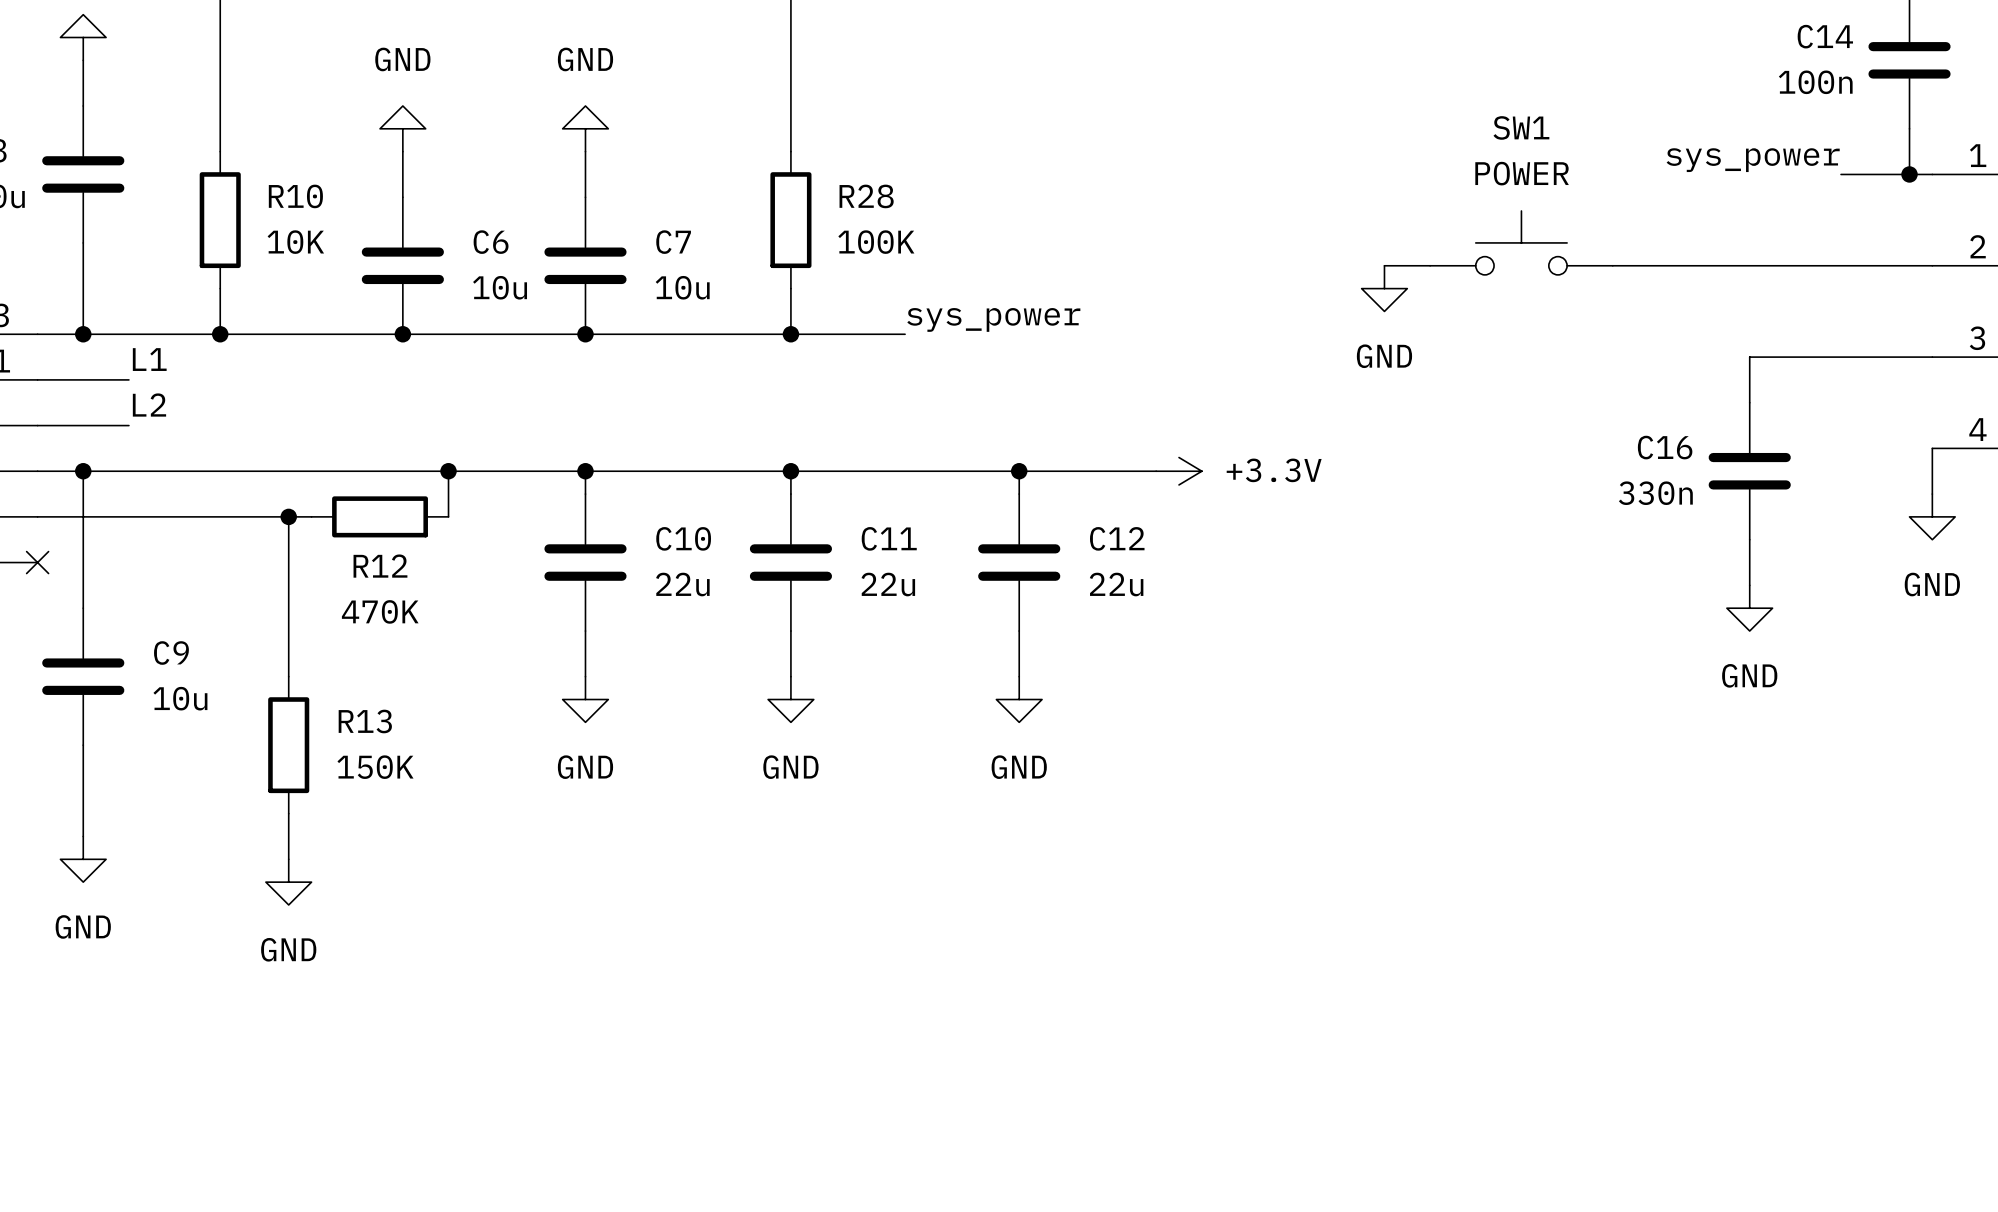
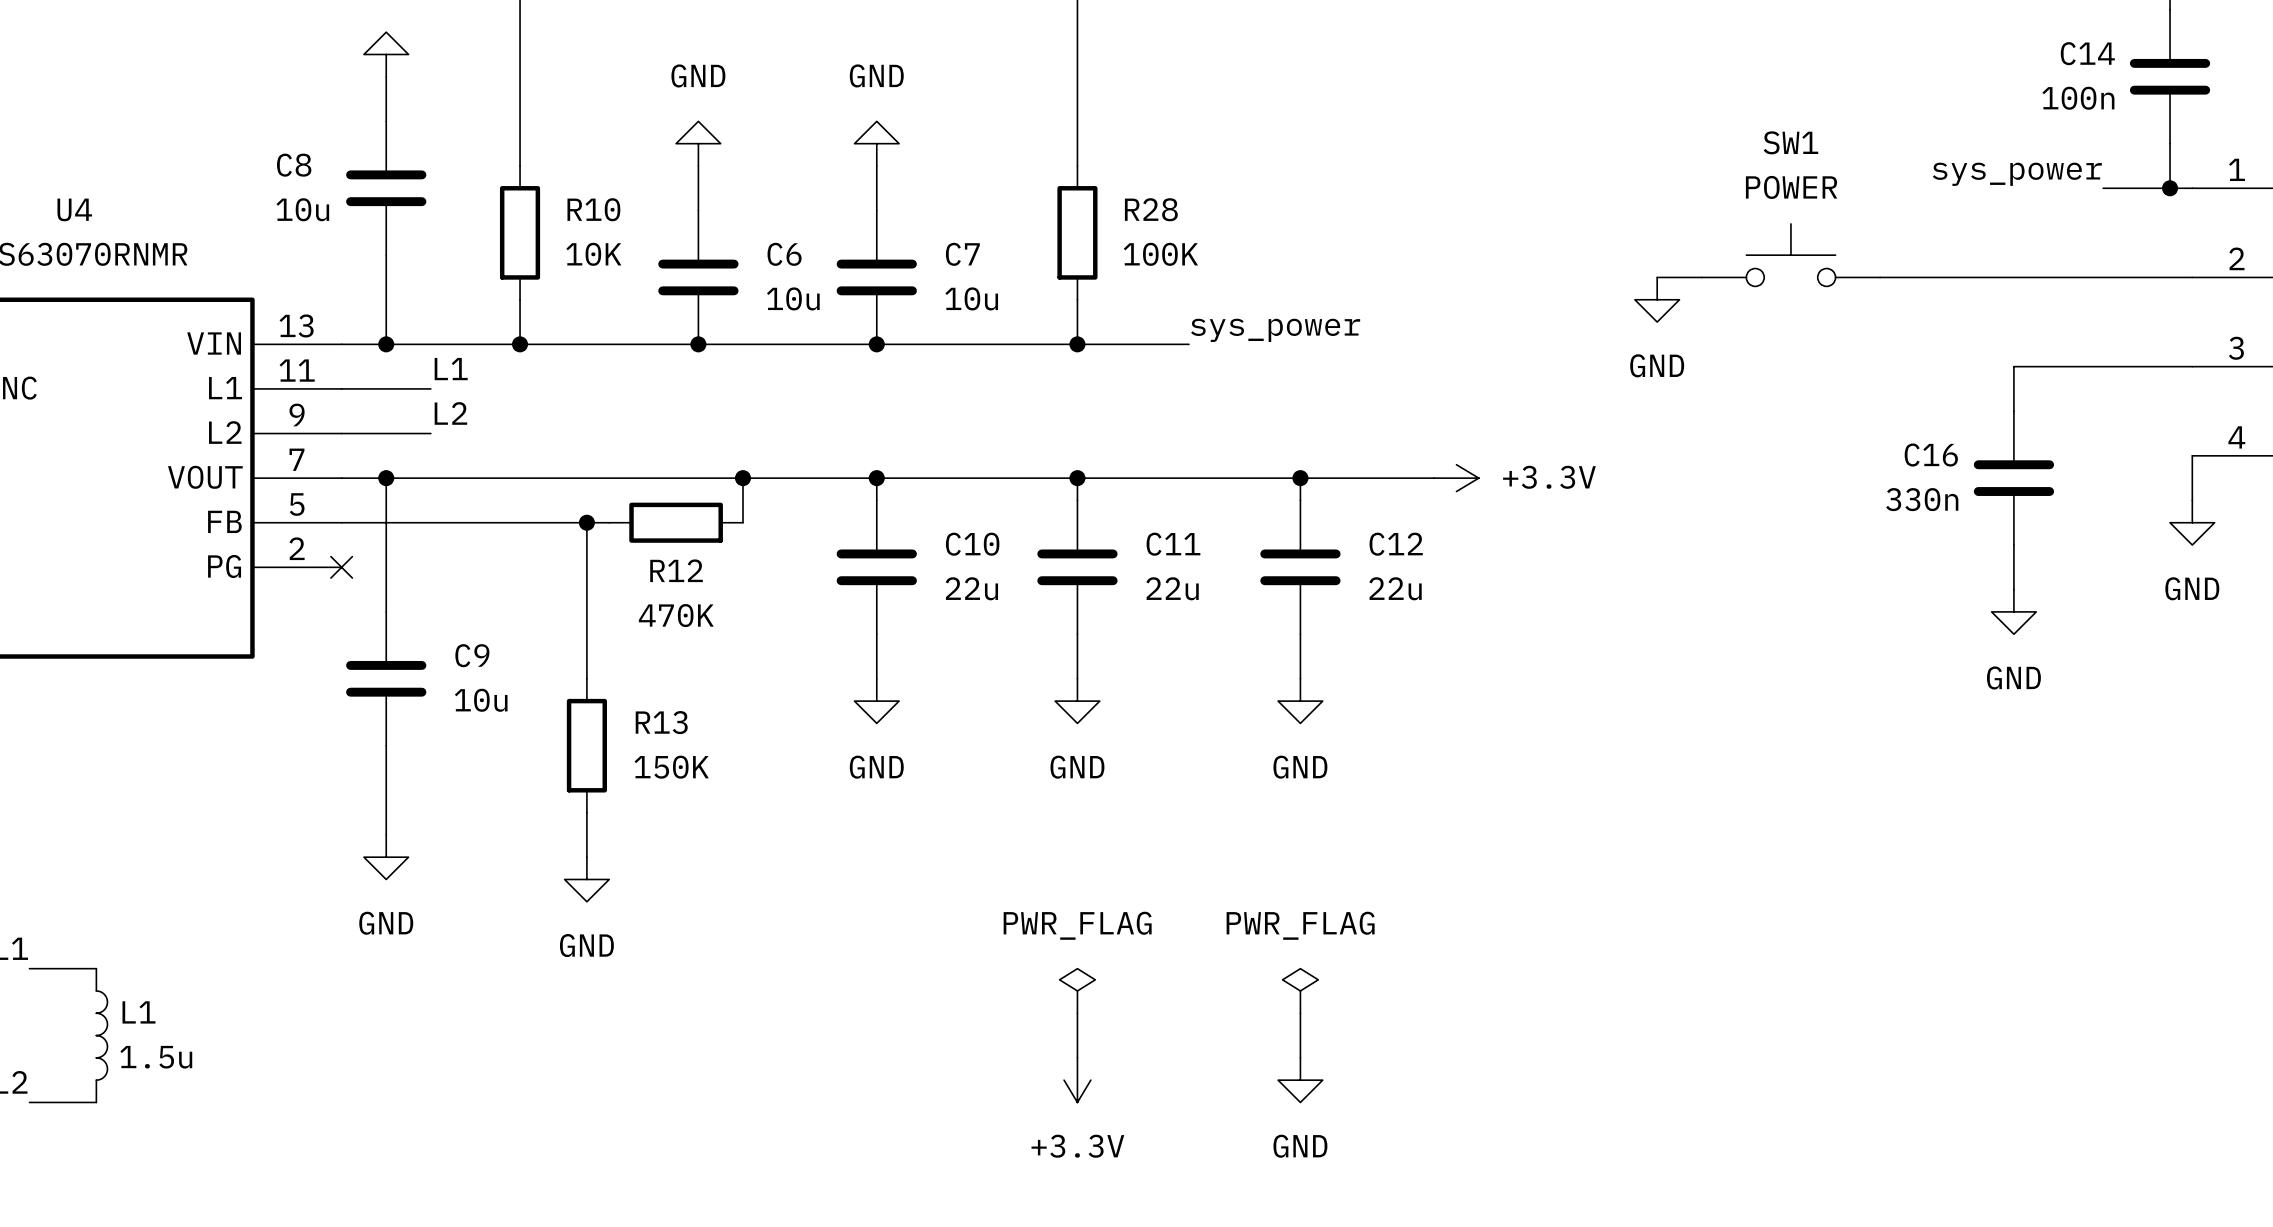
power symbol: none -> PWR_FLAG (1077, 990)
power symbol: none -> PWR_FLAG (1300, 990)
wire: none -> (1077, 1013) (1077, 1057)
wire: none -> (1300, 1013) (1300, 1057)
power symbol: none -> +3.3V (1077, 1080)
power symbol: none -> GND (1300, 1080)

